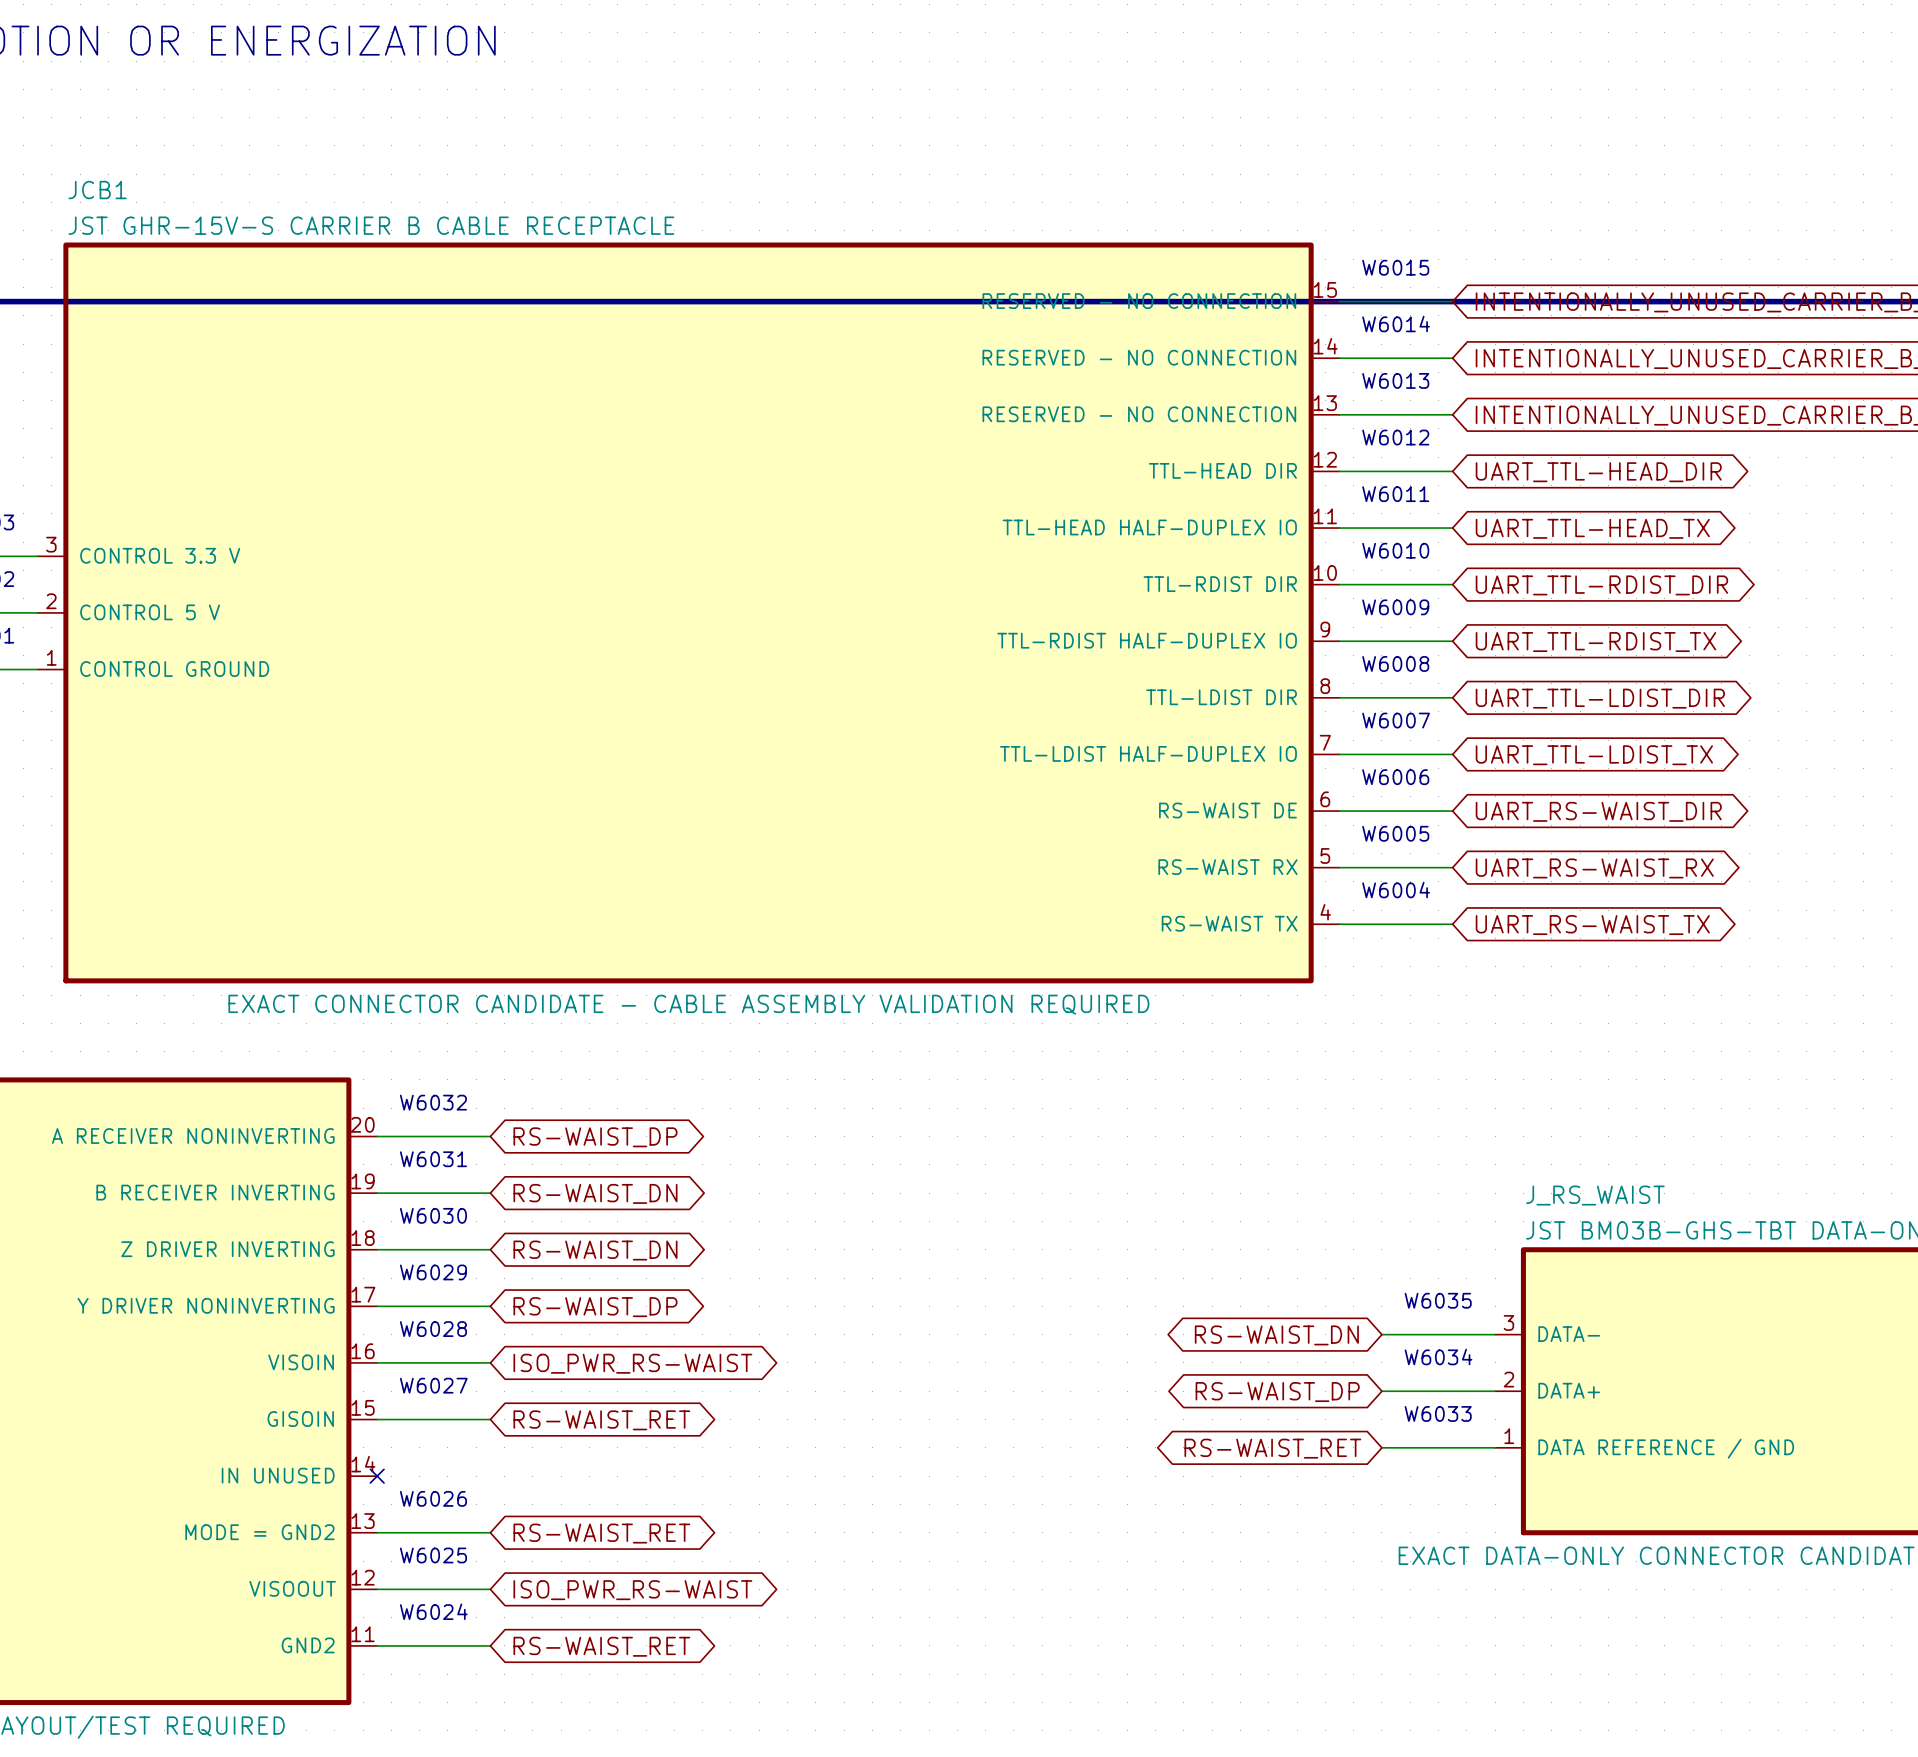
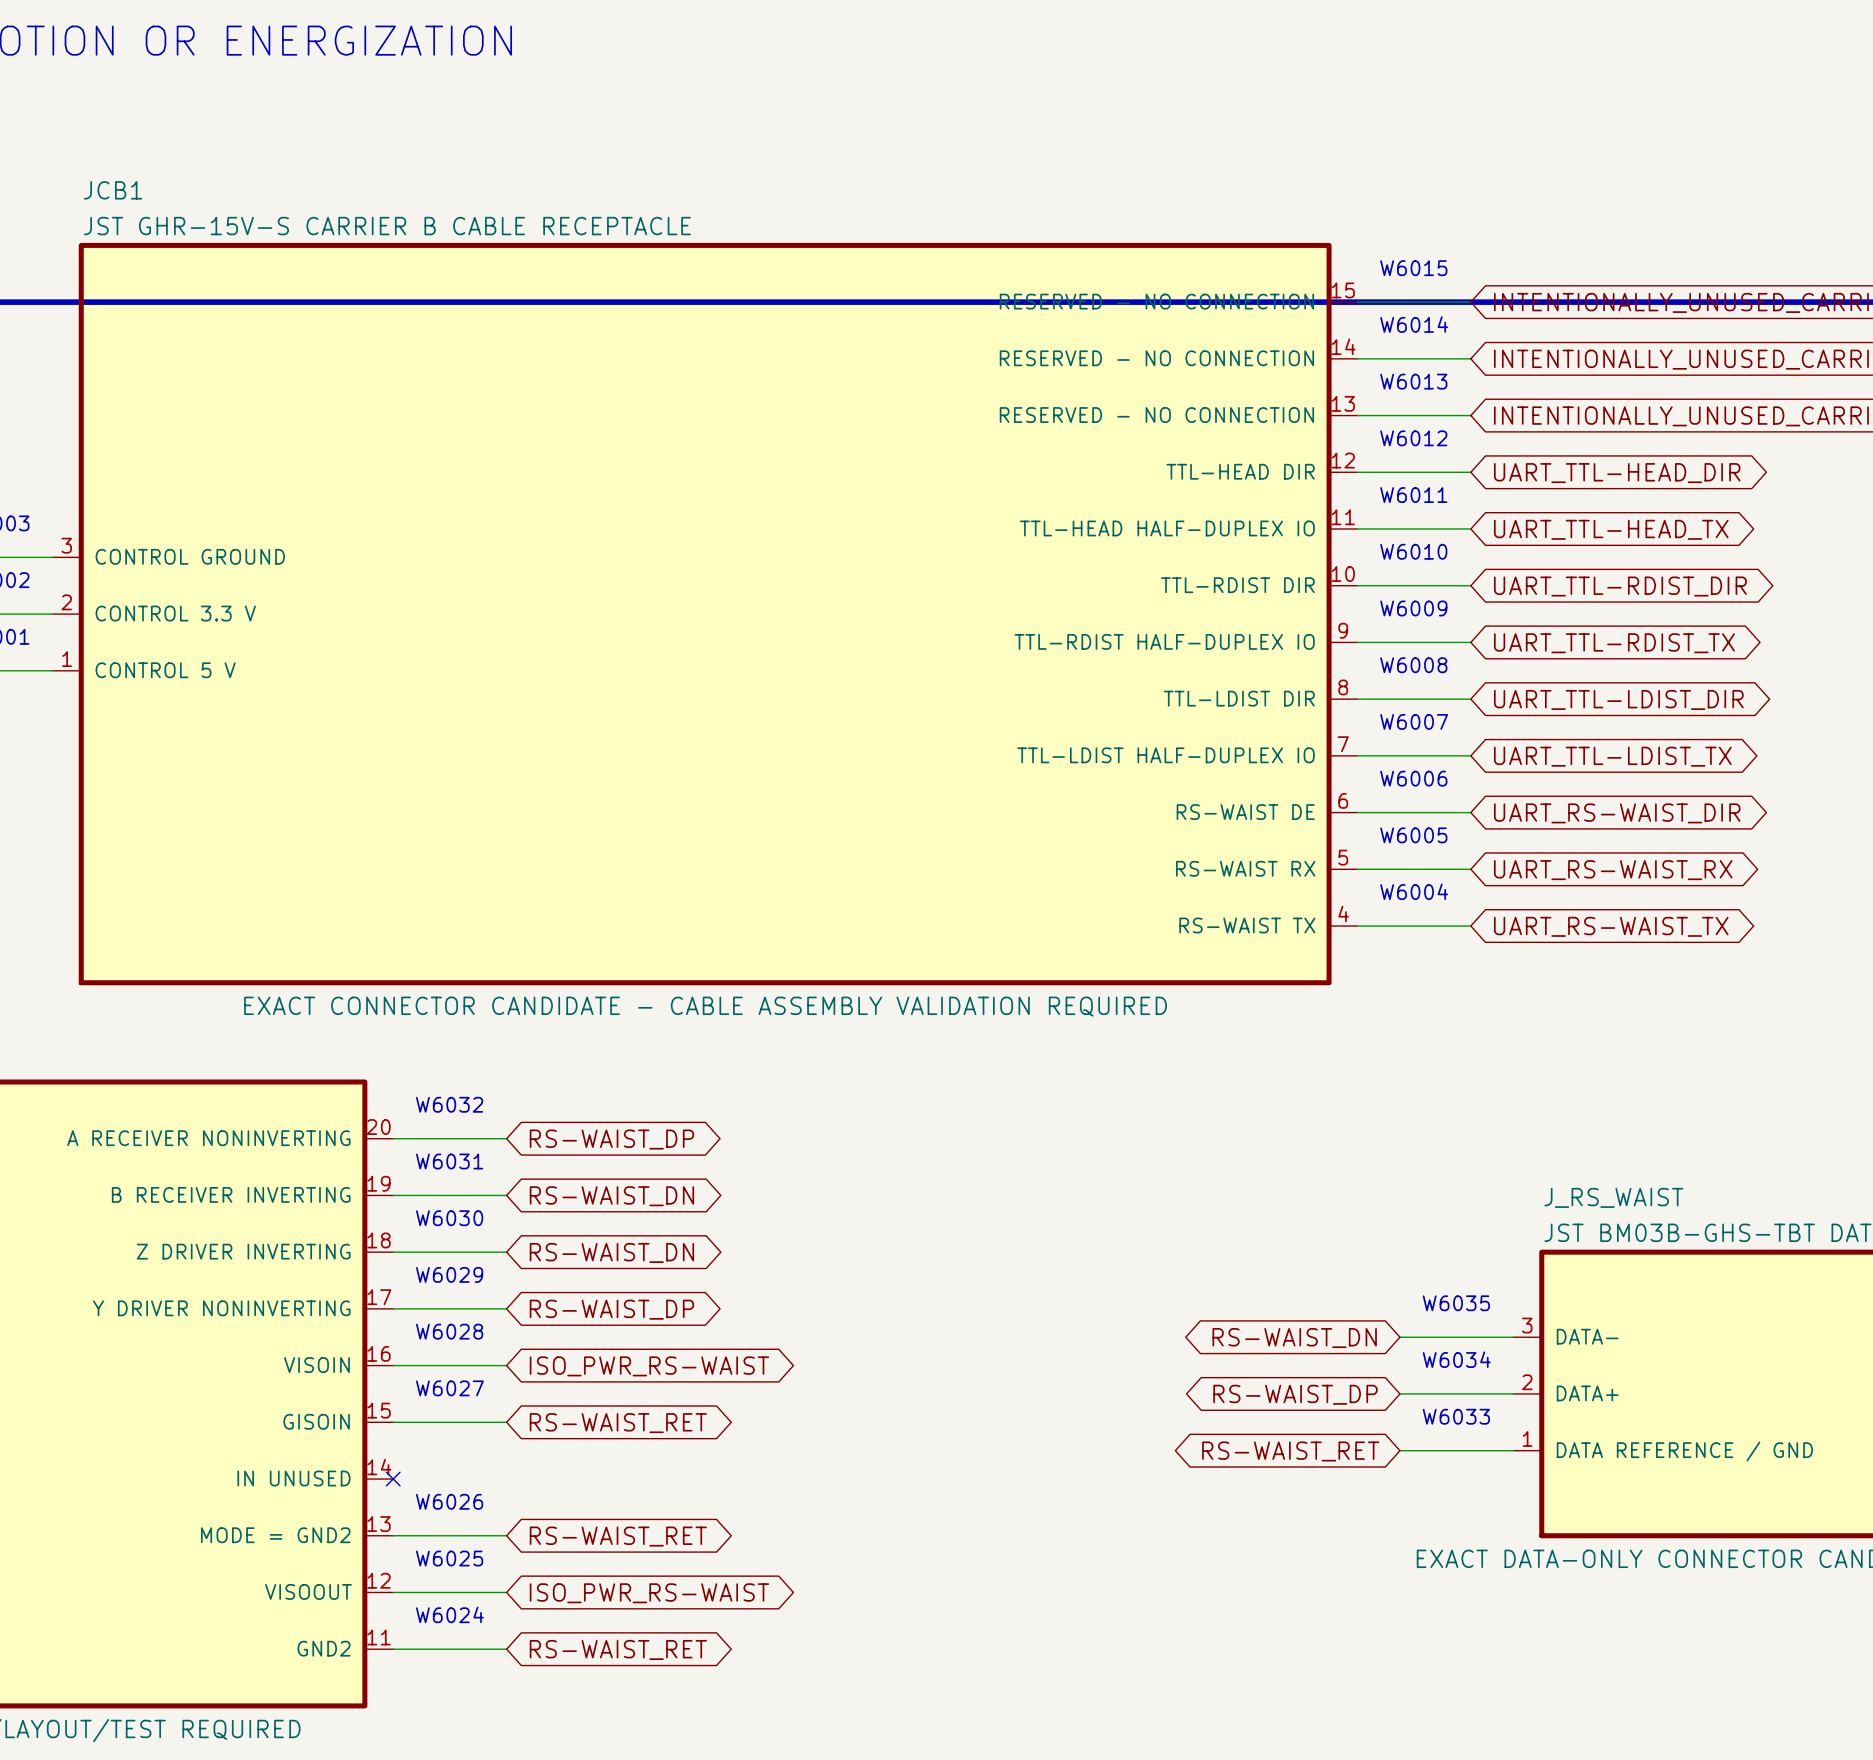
JCB1 pin name: CONTROL 3.3 V (160, 555) -> CONTROL GROUND (190, 556)
JCB1 pin name: CONTROL 5 V (150, 612) -> CONTROL 3.3 V (175, 613)
JCB1 pin name: CONTROL GROUND (174, 669) -> CONTROL 5 V (165, 670)

